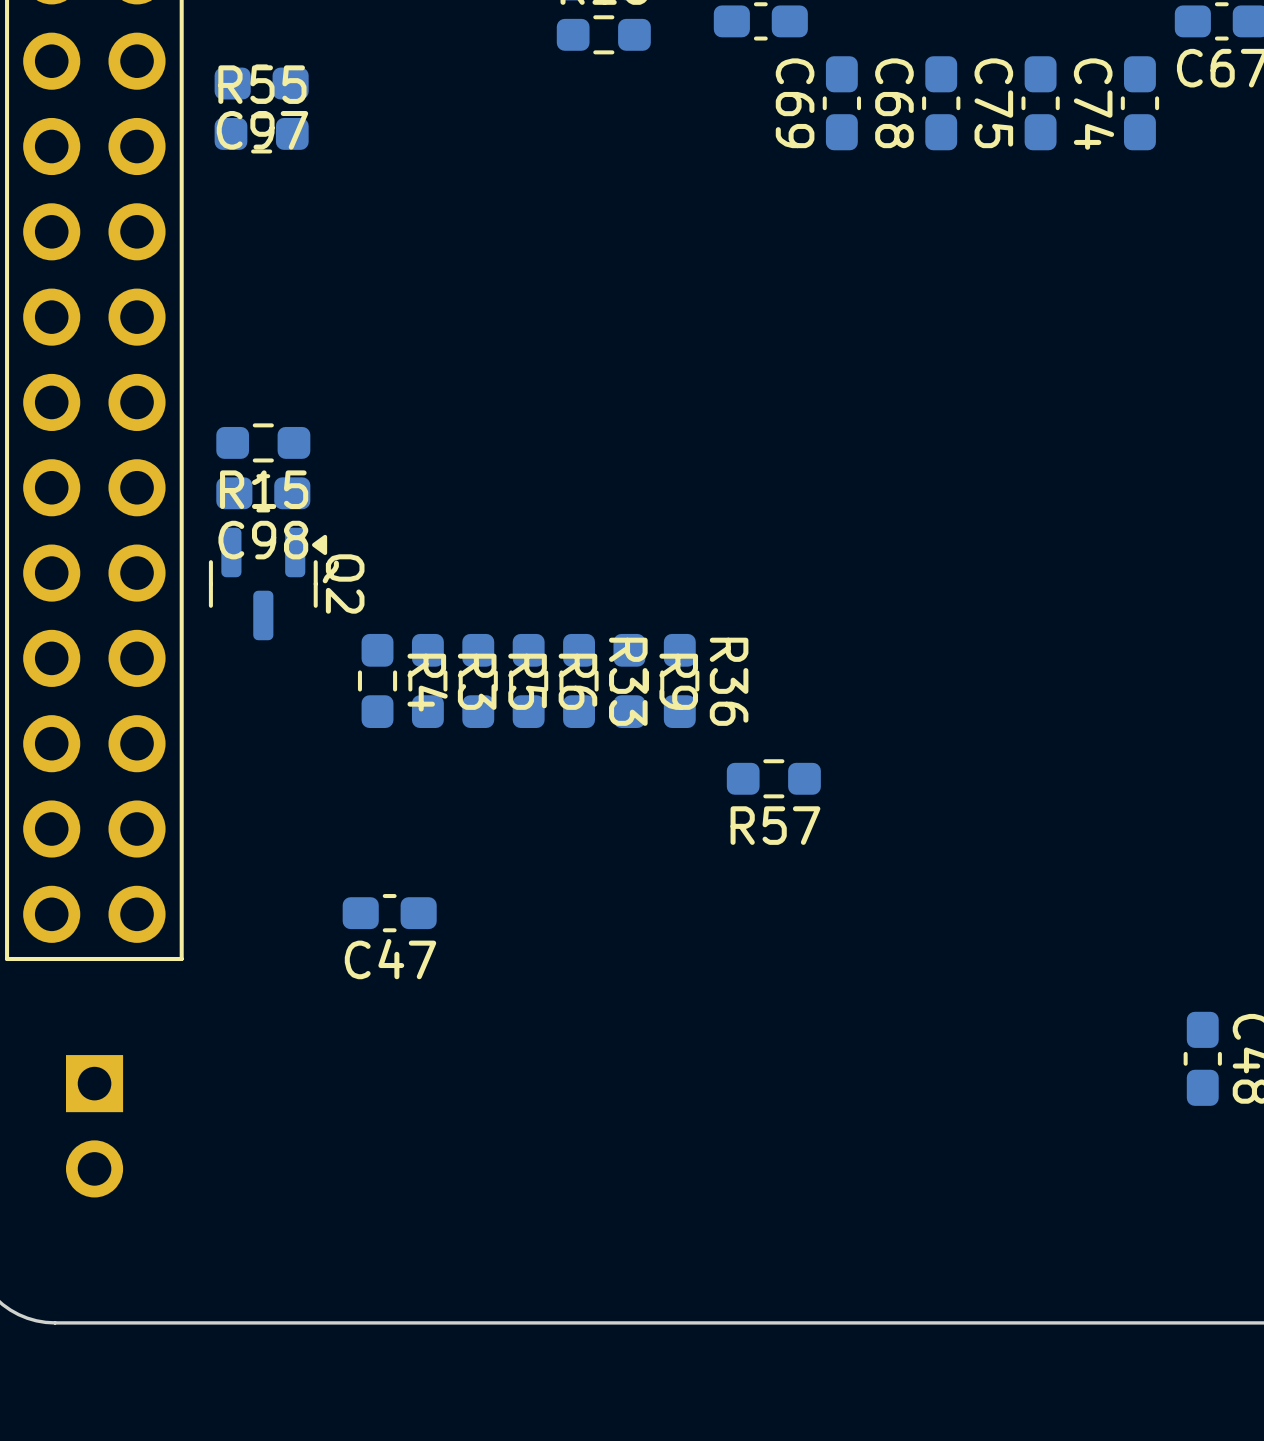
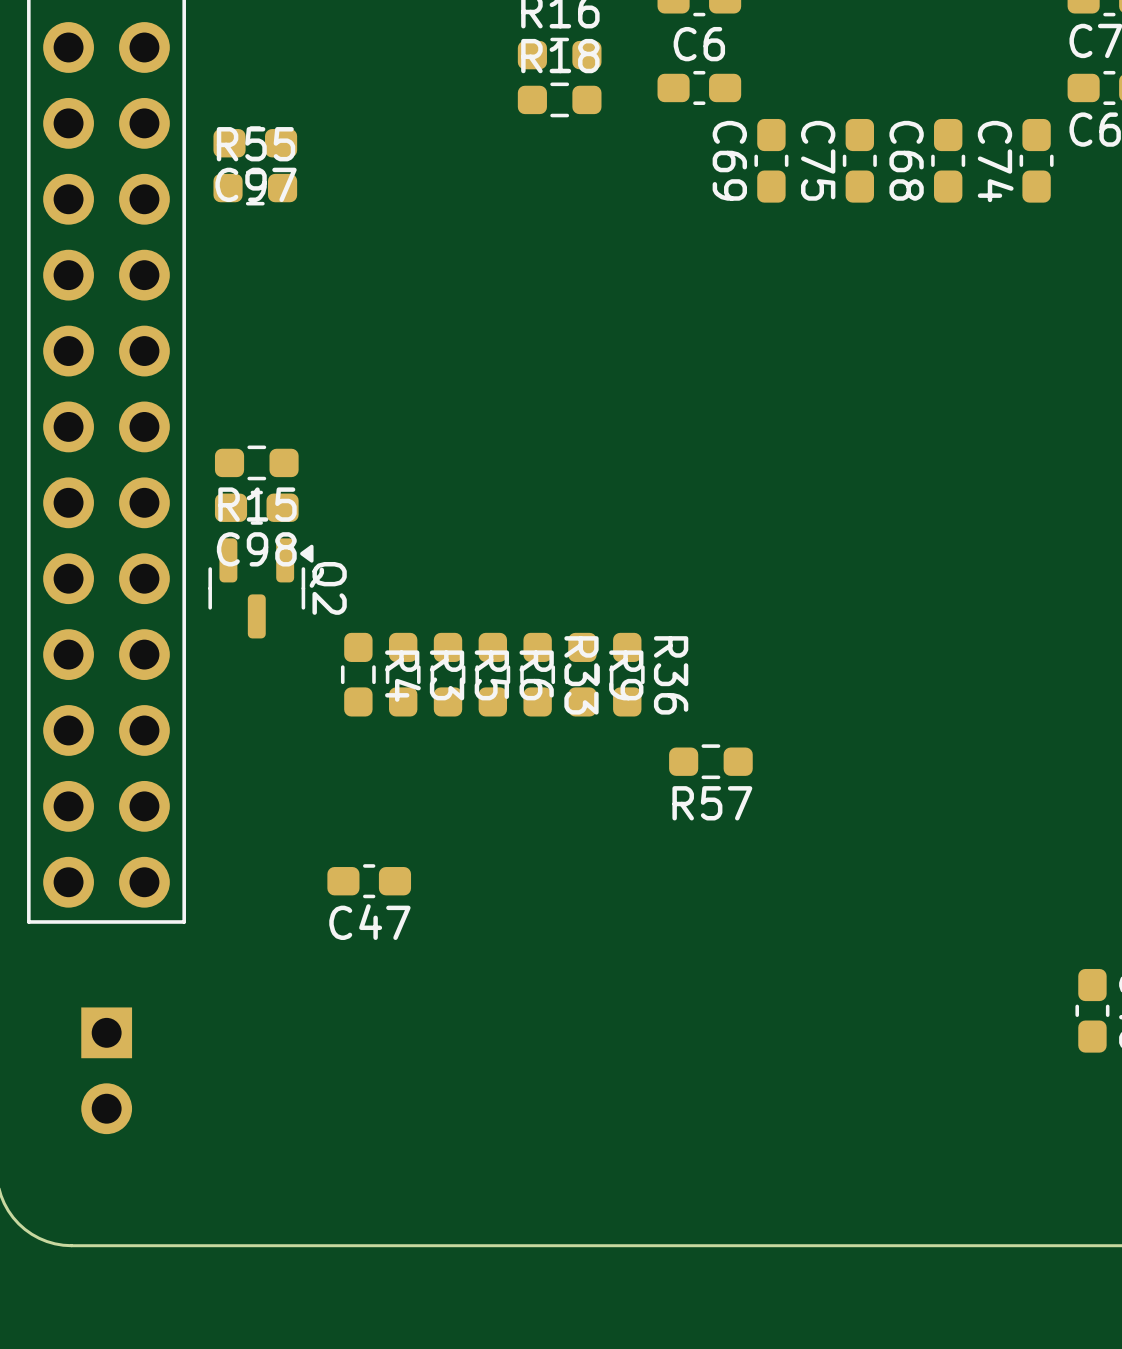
C68 name: C68 (894, 103) -> C75 (818, 160)
C75 name: C75 (993, 103) -> C68 (906, 160)

